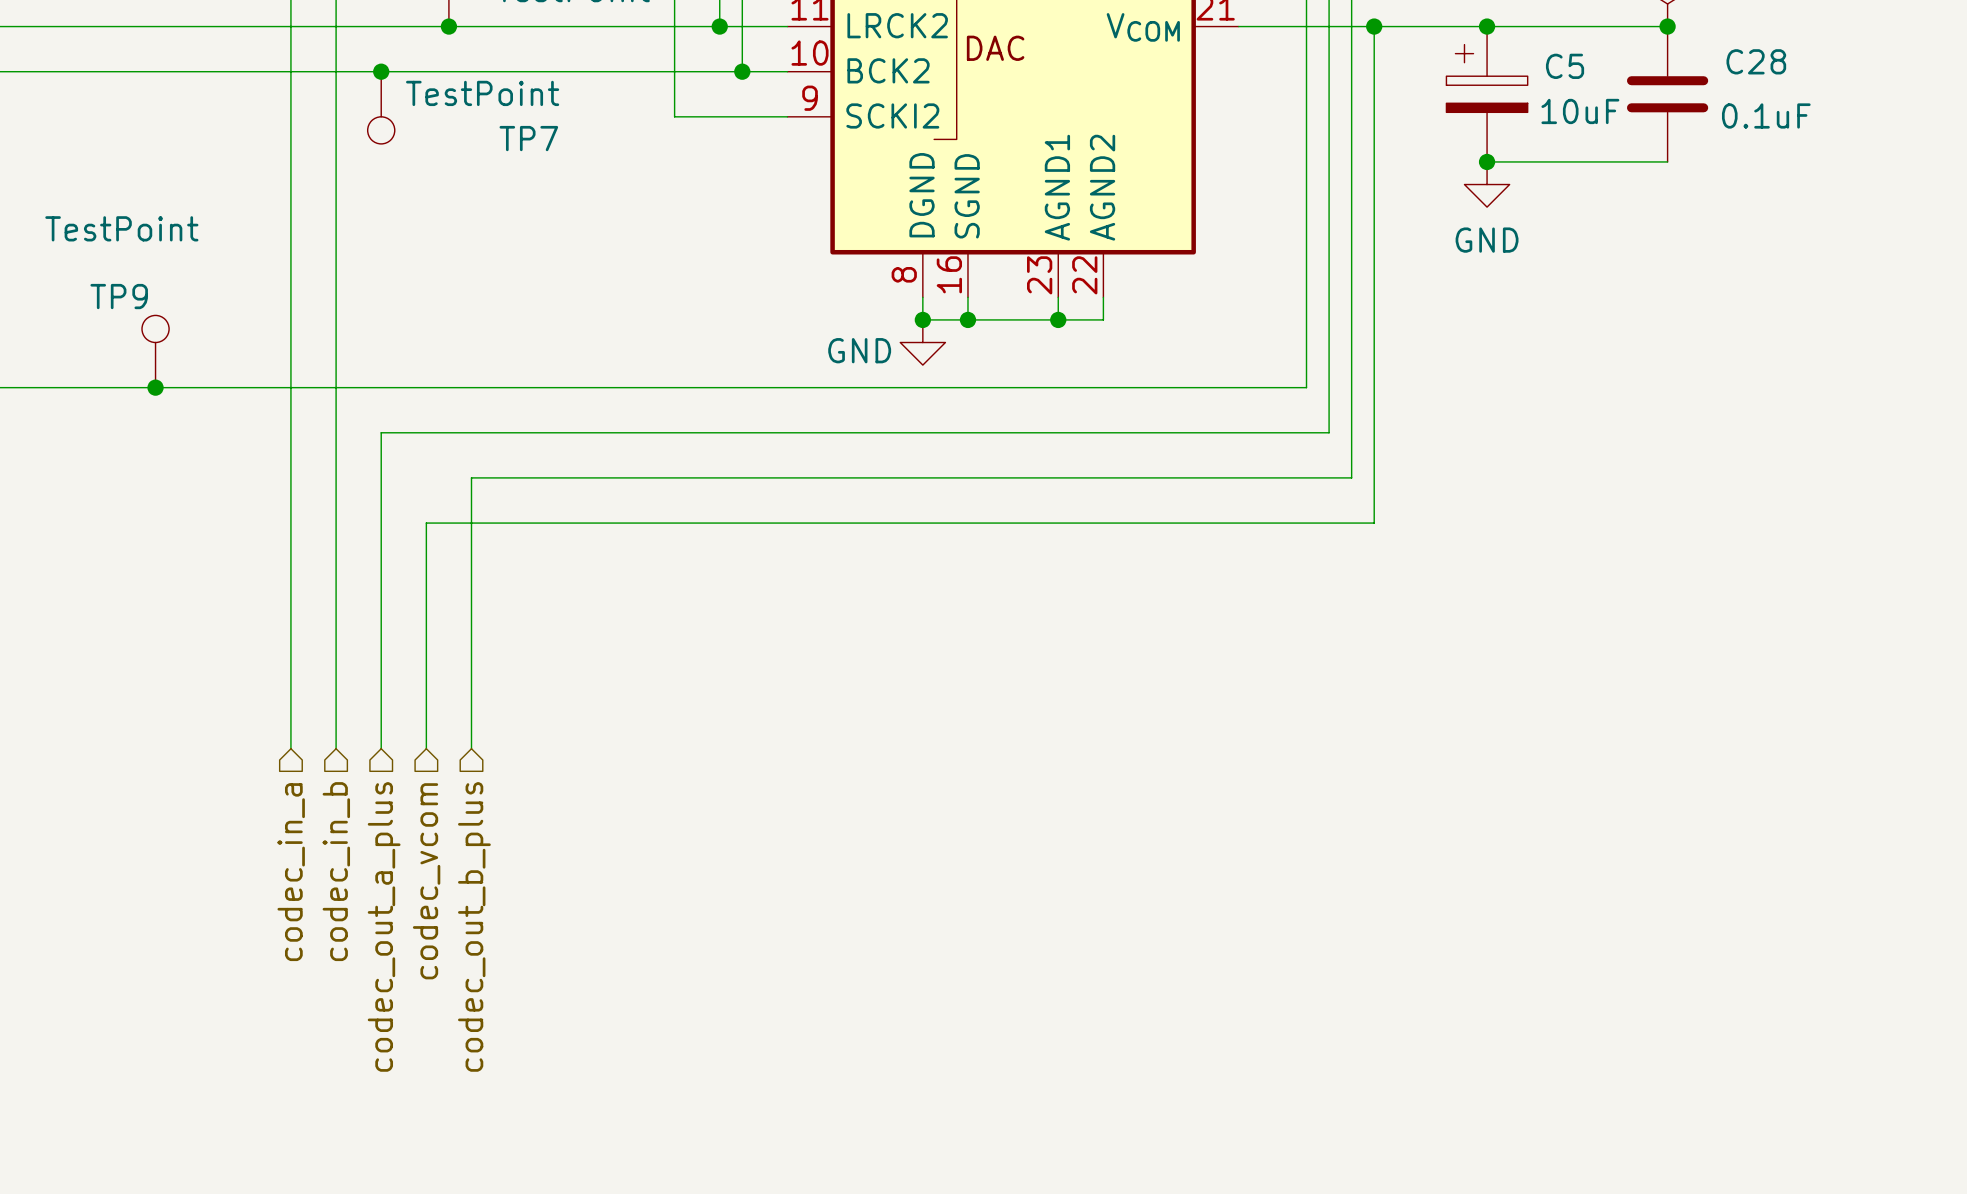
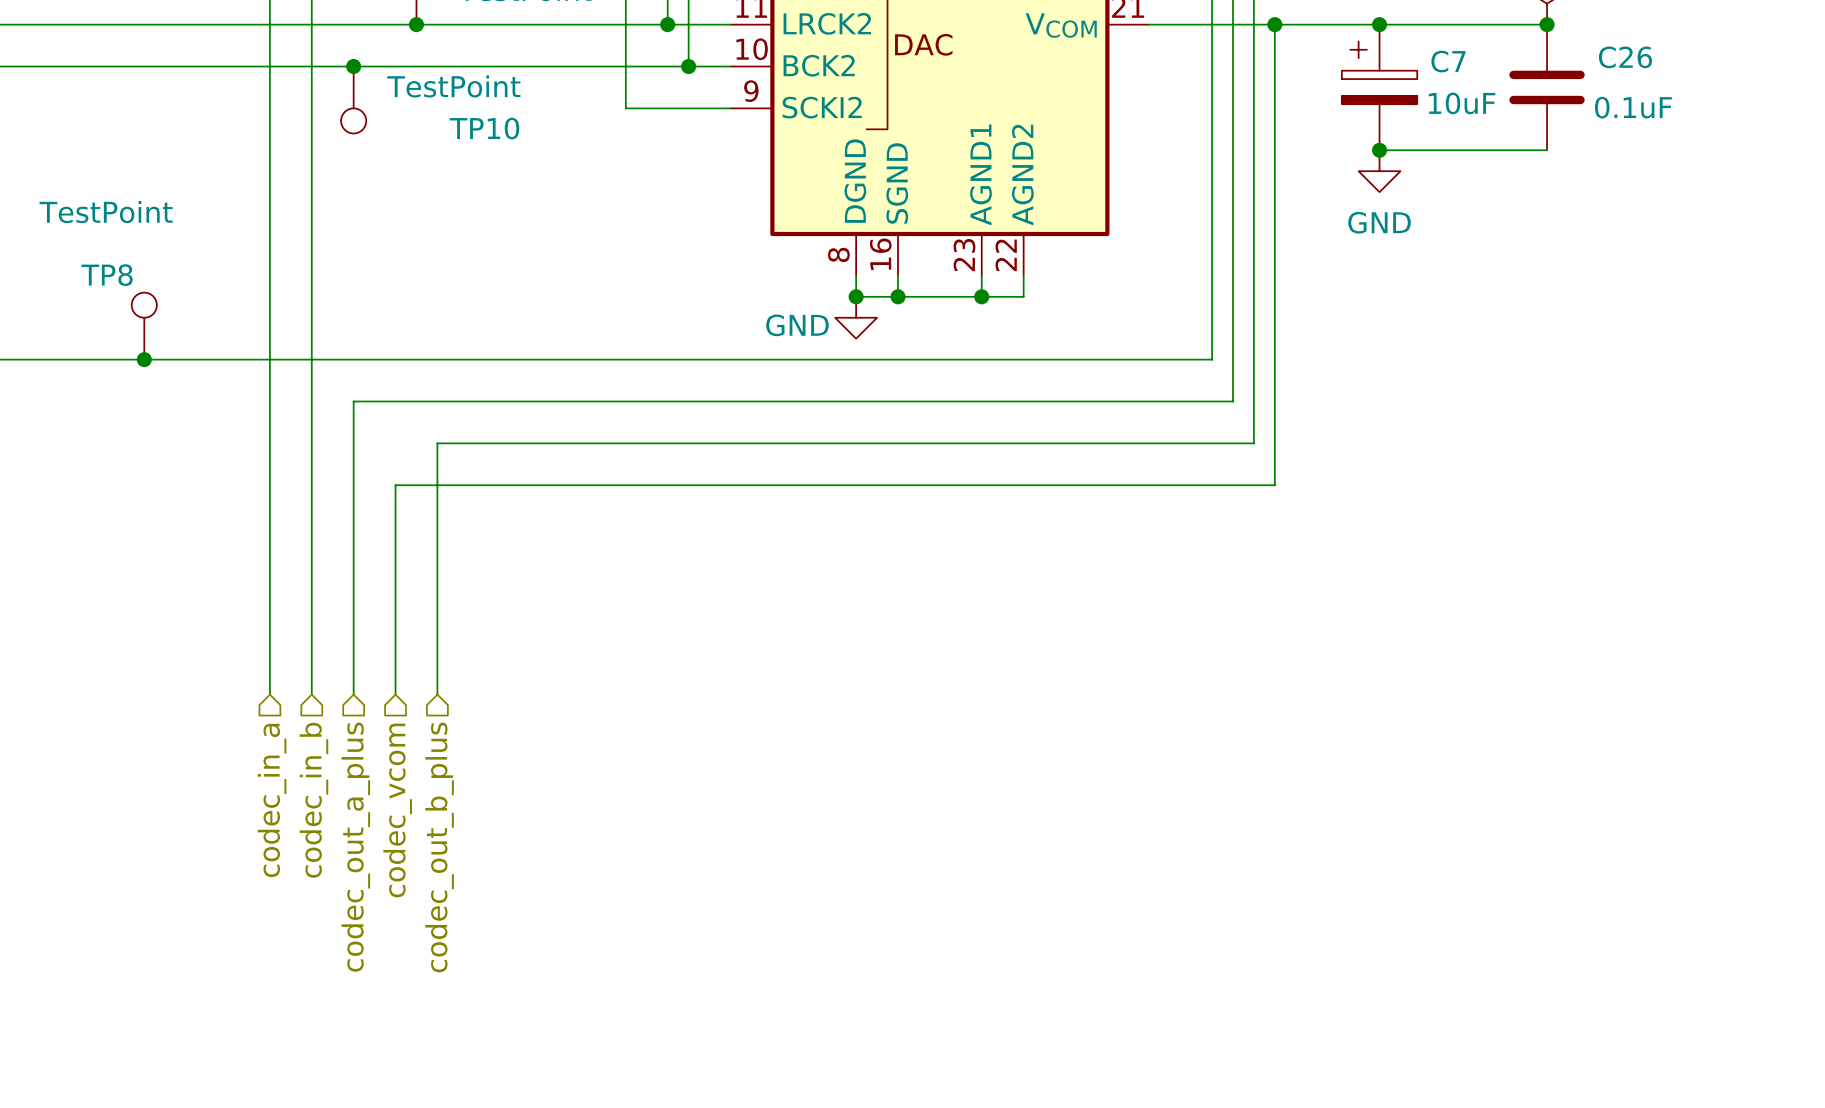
C28 name: C28 (1756, 61) -> C26 (1625, 57)
C5 name: C5 (1565, 66) -> C7 (1448, 61)
TP7 name: TP7 (528, 138) -> TP10 (484, 128)
TP9 name: TP9 (119, 296) -> TP8 (107, 275)

